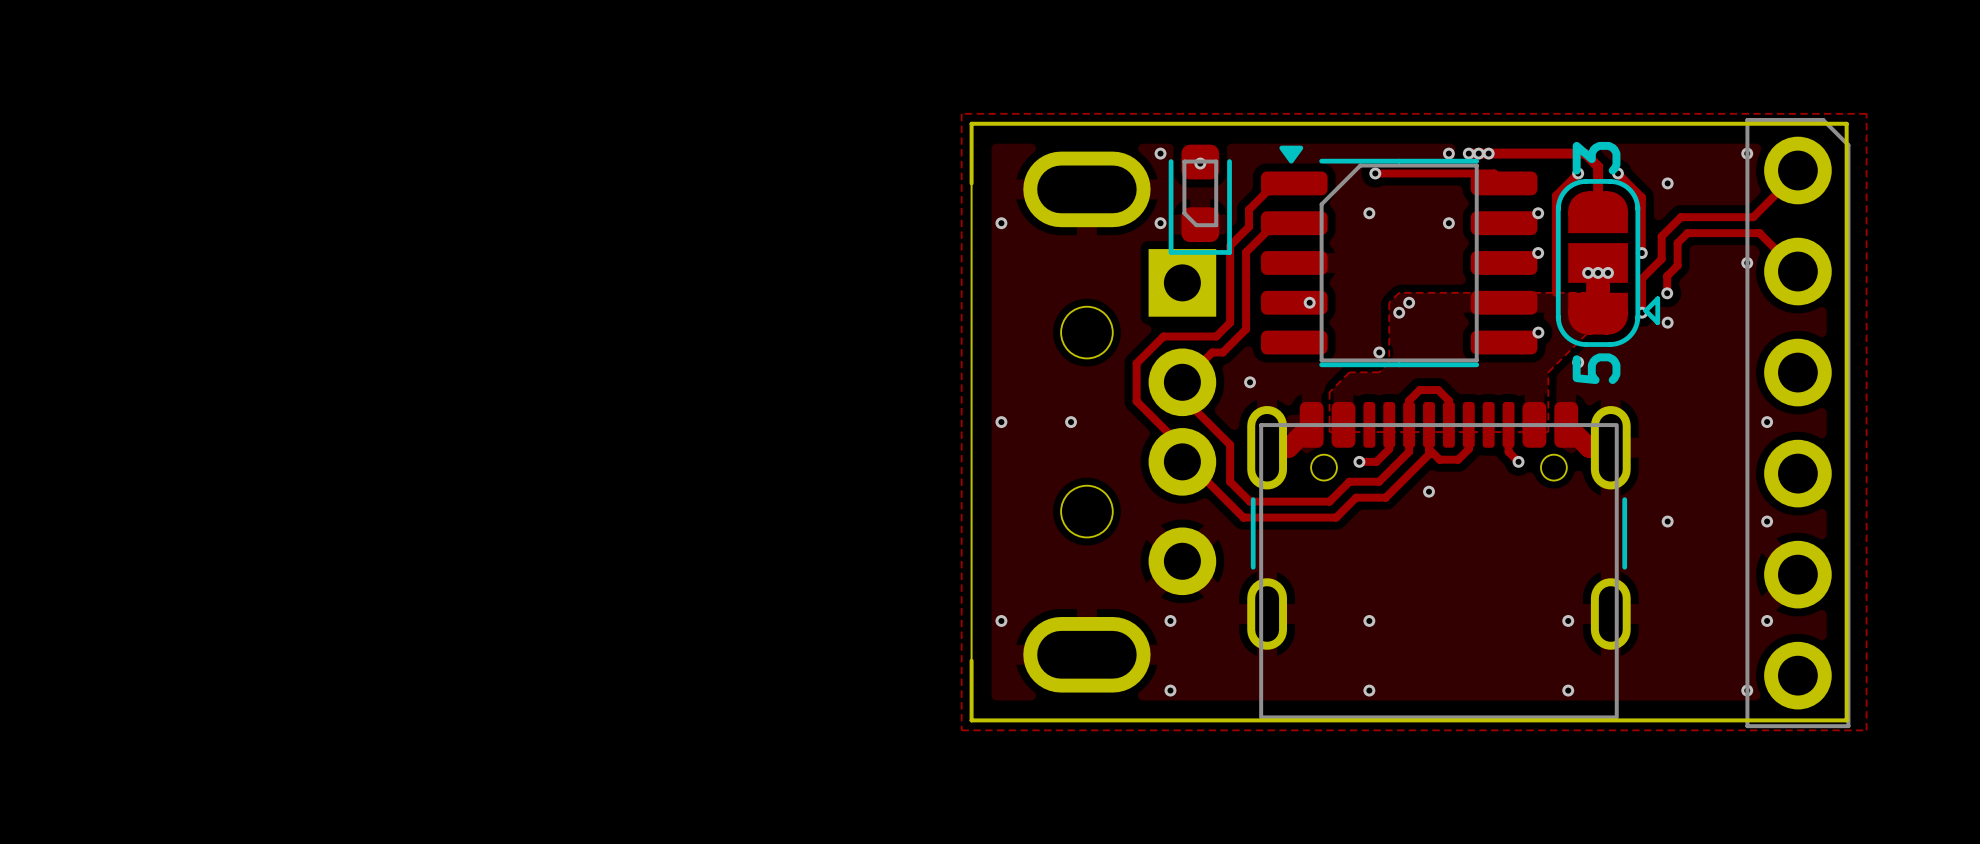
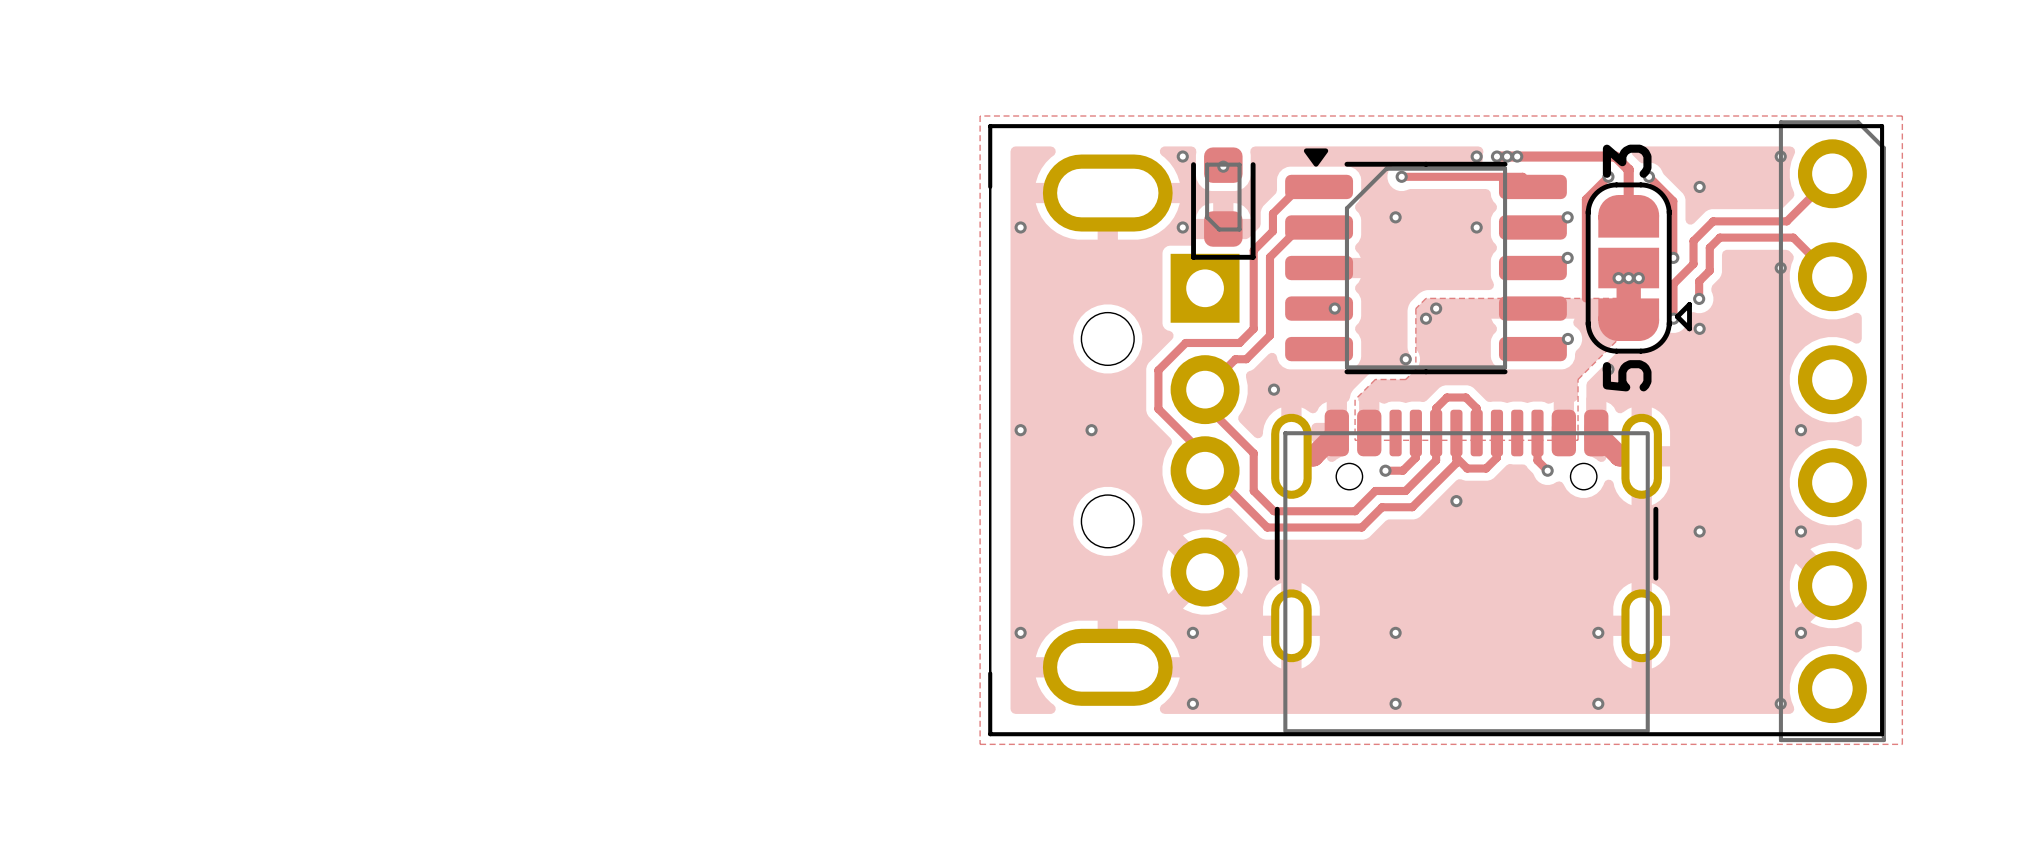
board edge: none -> (990, 186) (990, 673)

